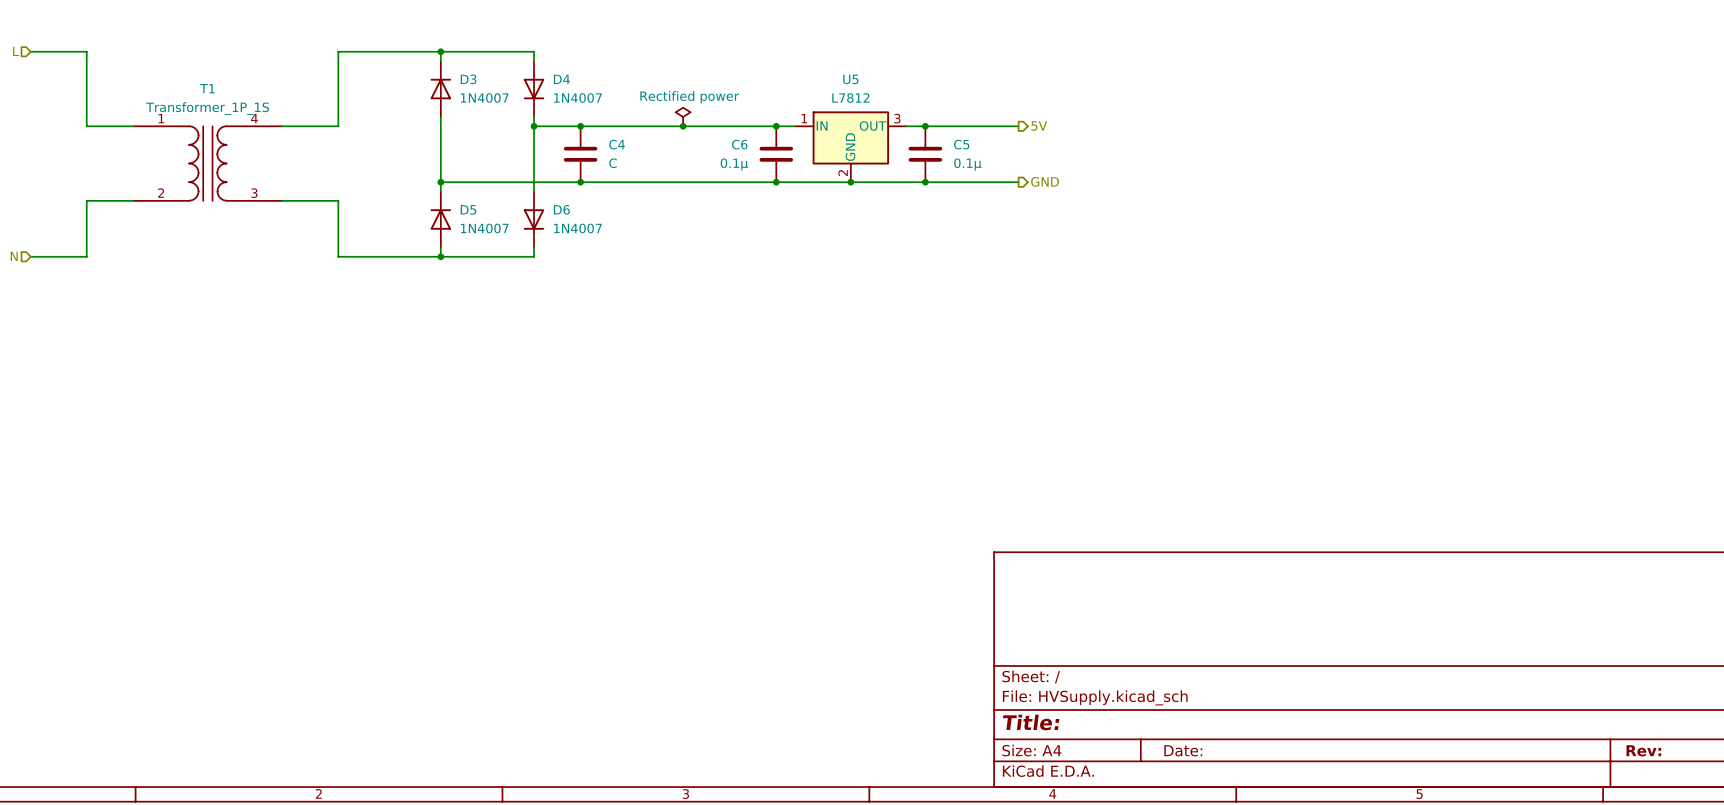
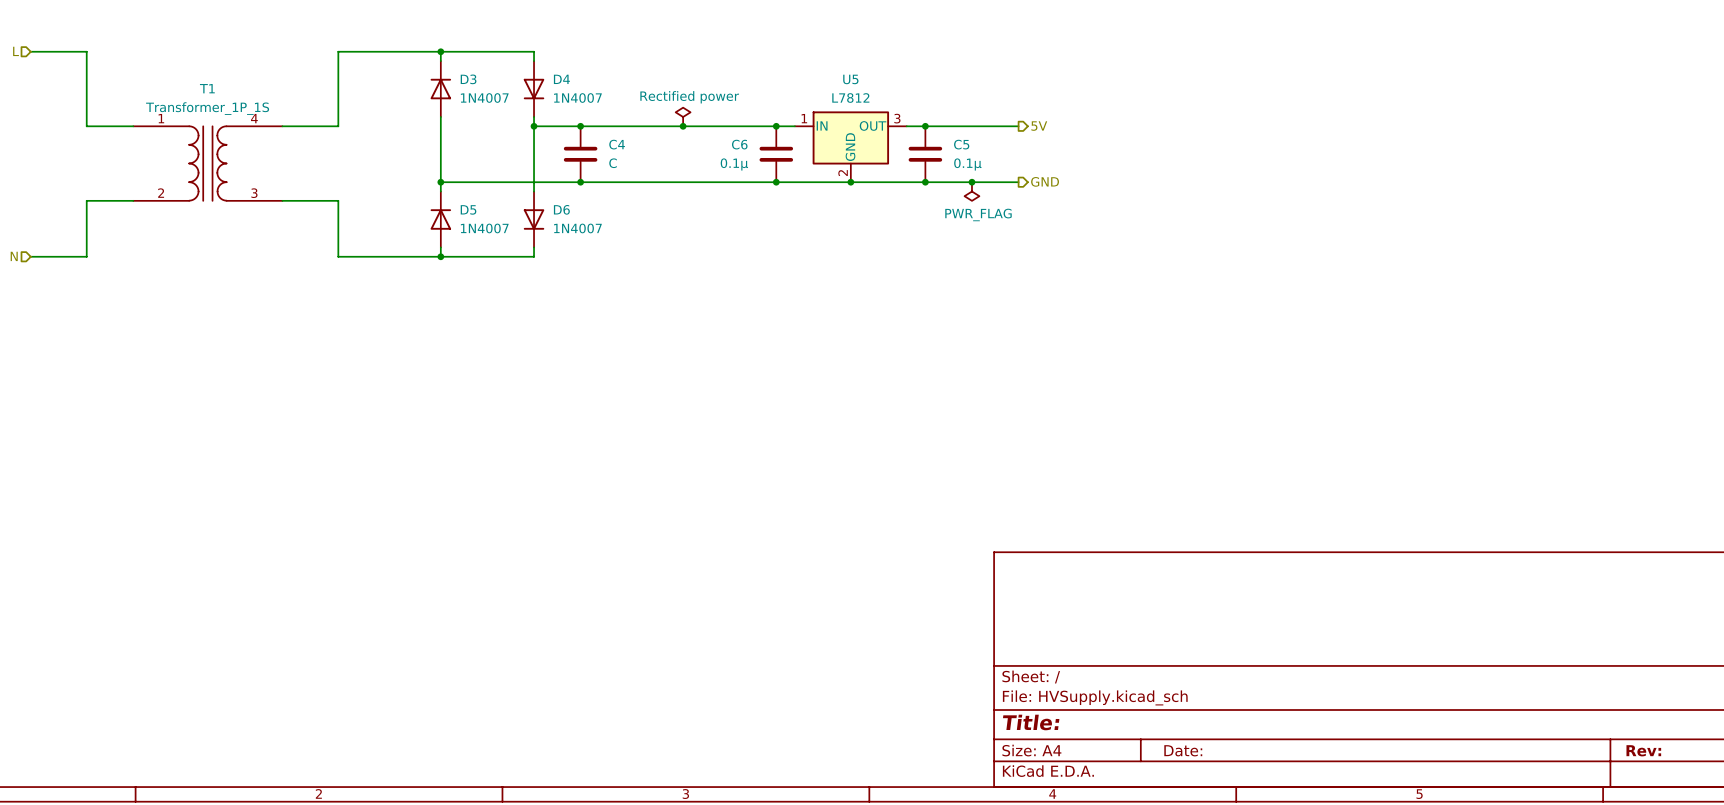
junction: none -> (971, 182)
power symbol: none -> PWR_FLAG (971, 191)

